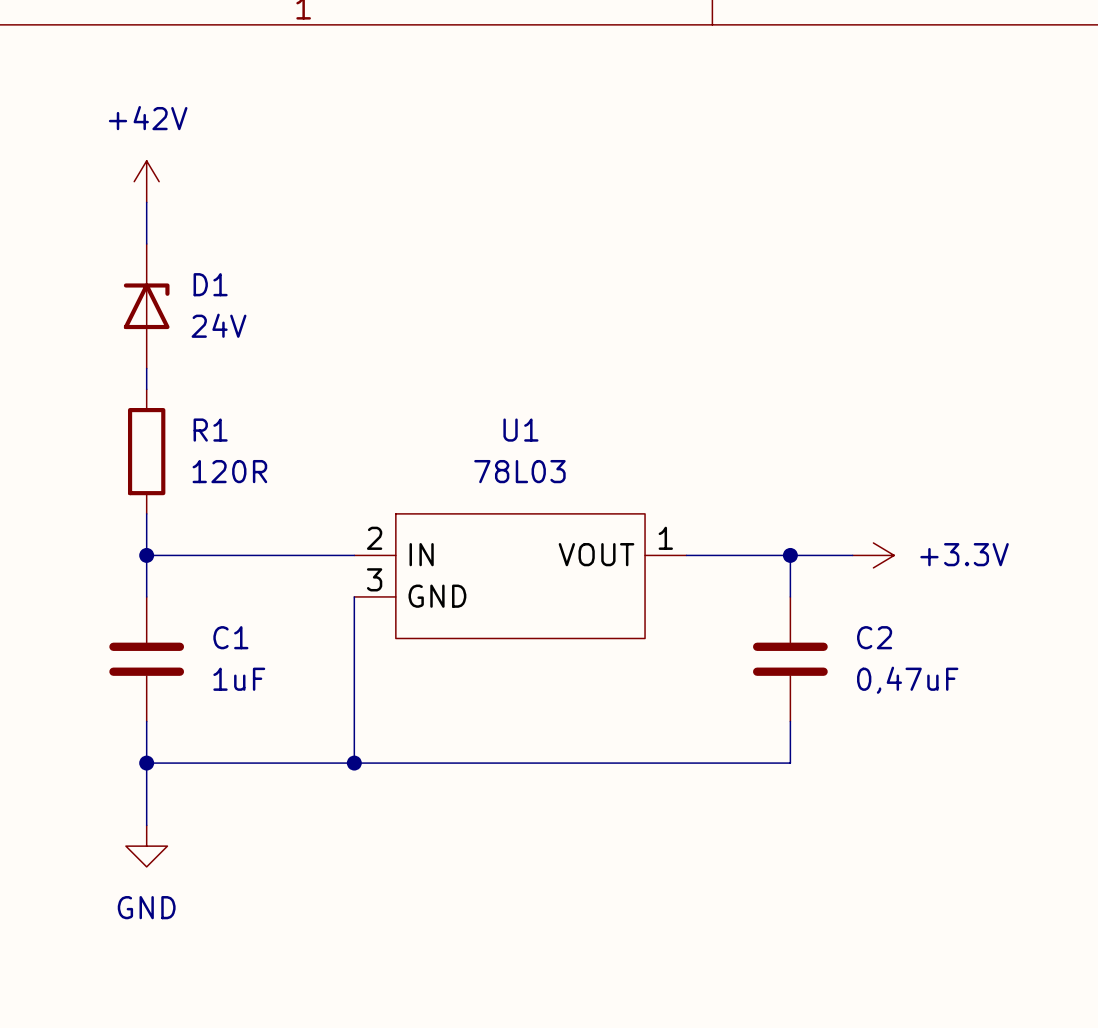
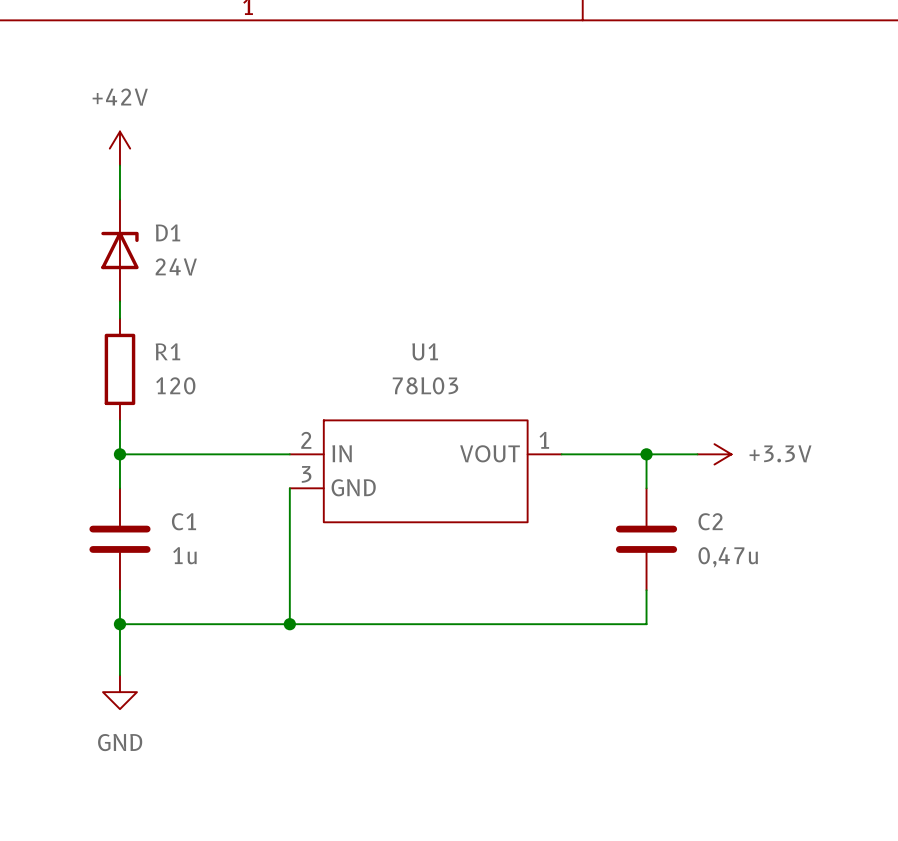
R1 value: 120R (229, 471) -> 120 (175, 385)
C1 value: 1uF (239, 679) -> 1u (184, 555)
C2 value: 0,47uF (907, 680) -> 0,47u (728, 557)

